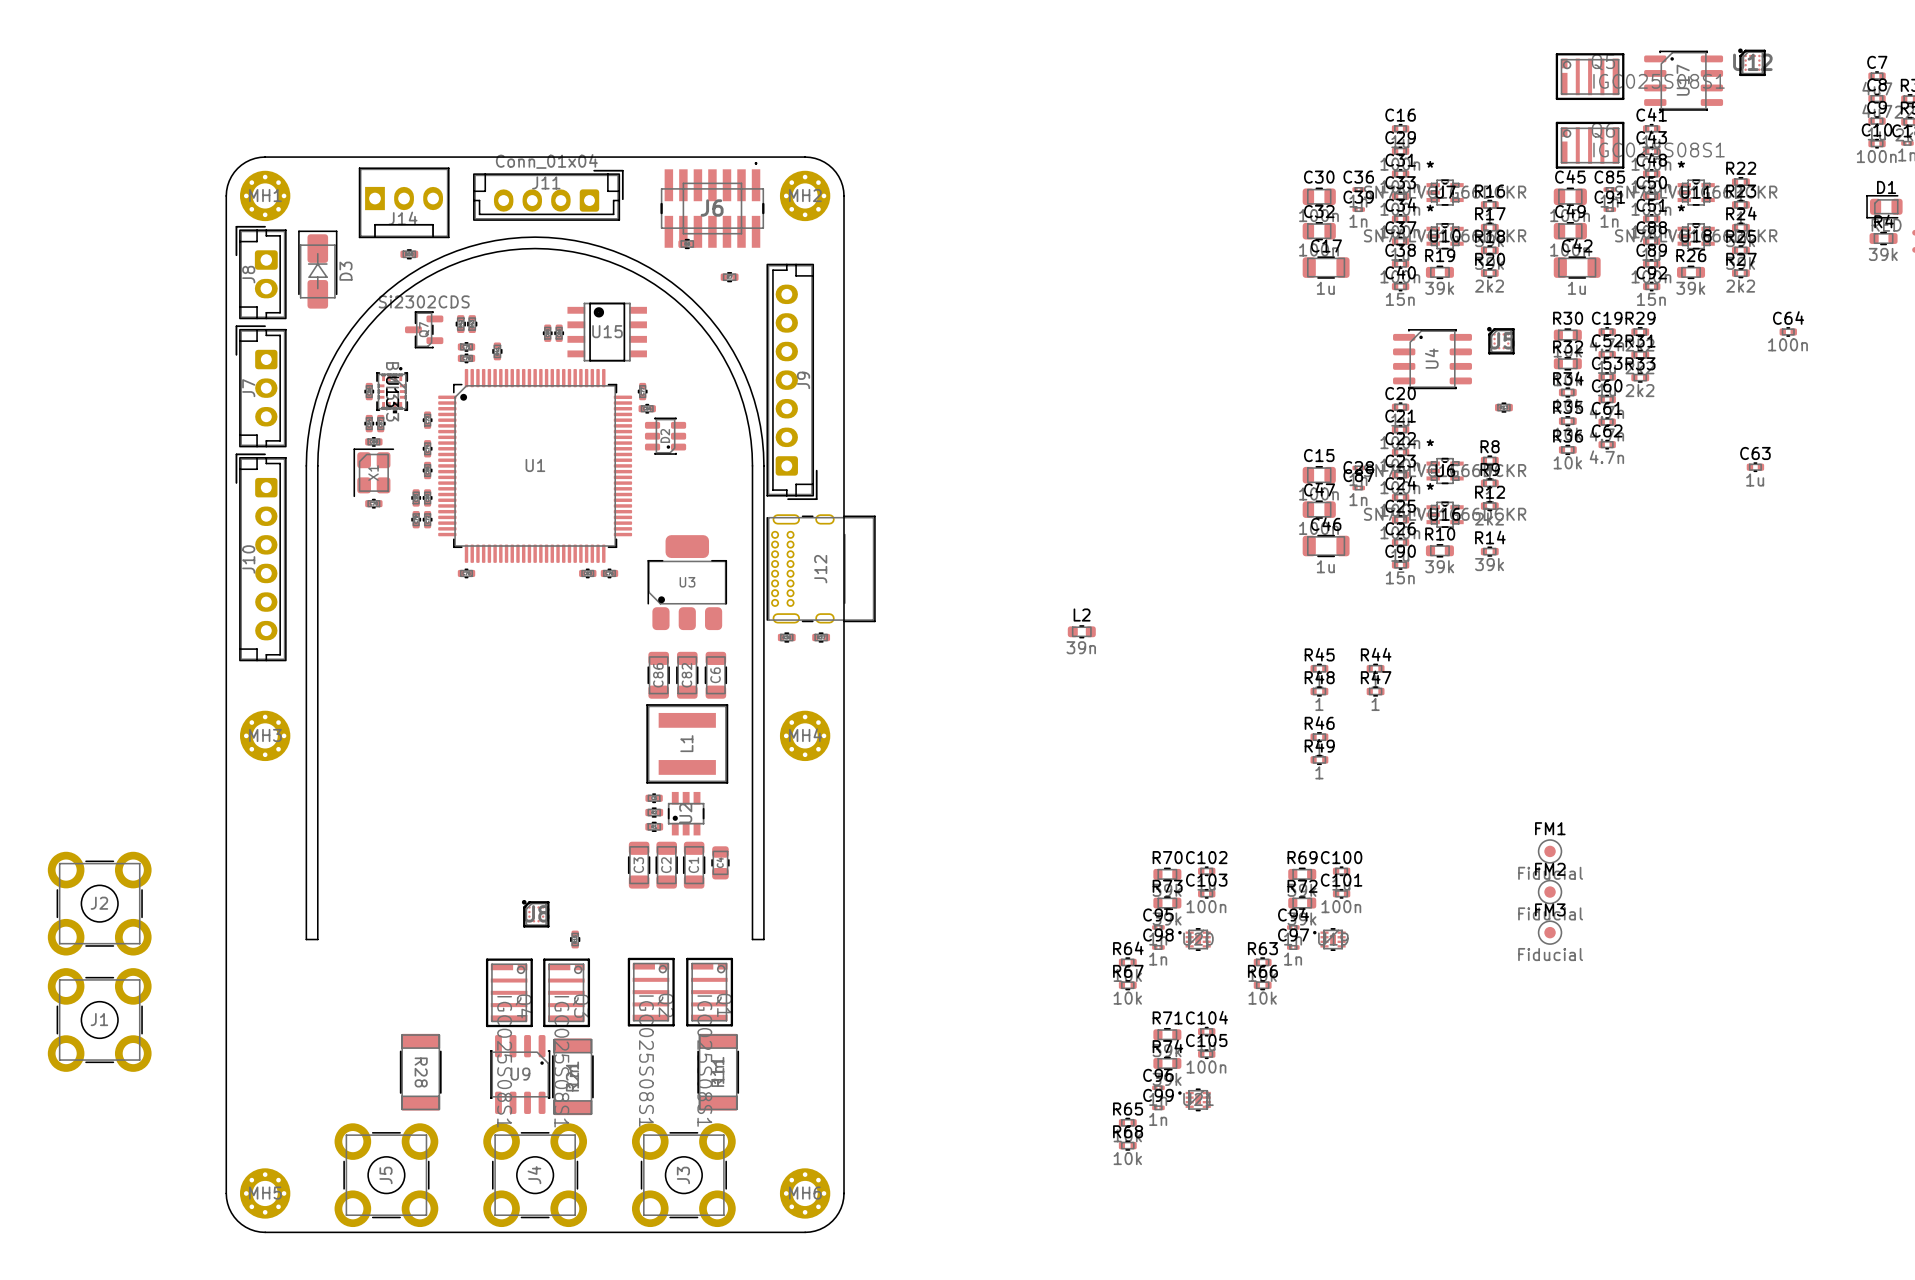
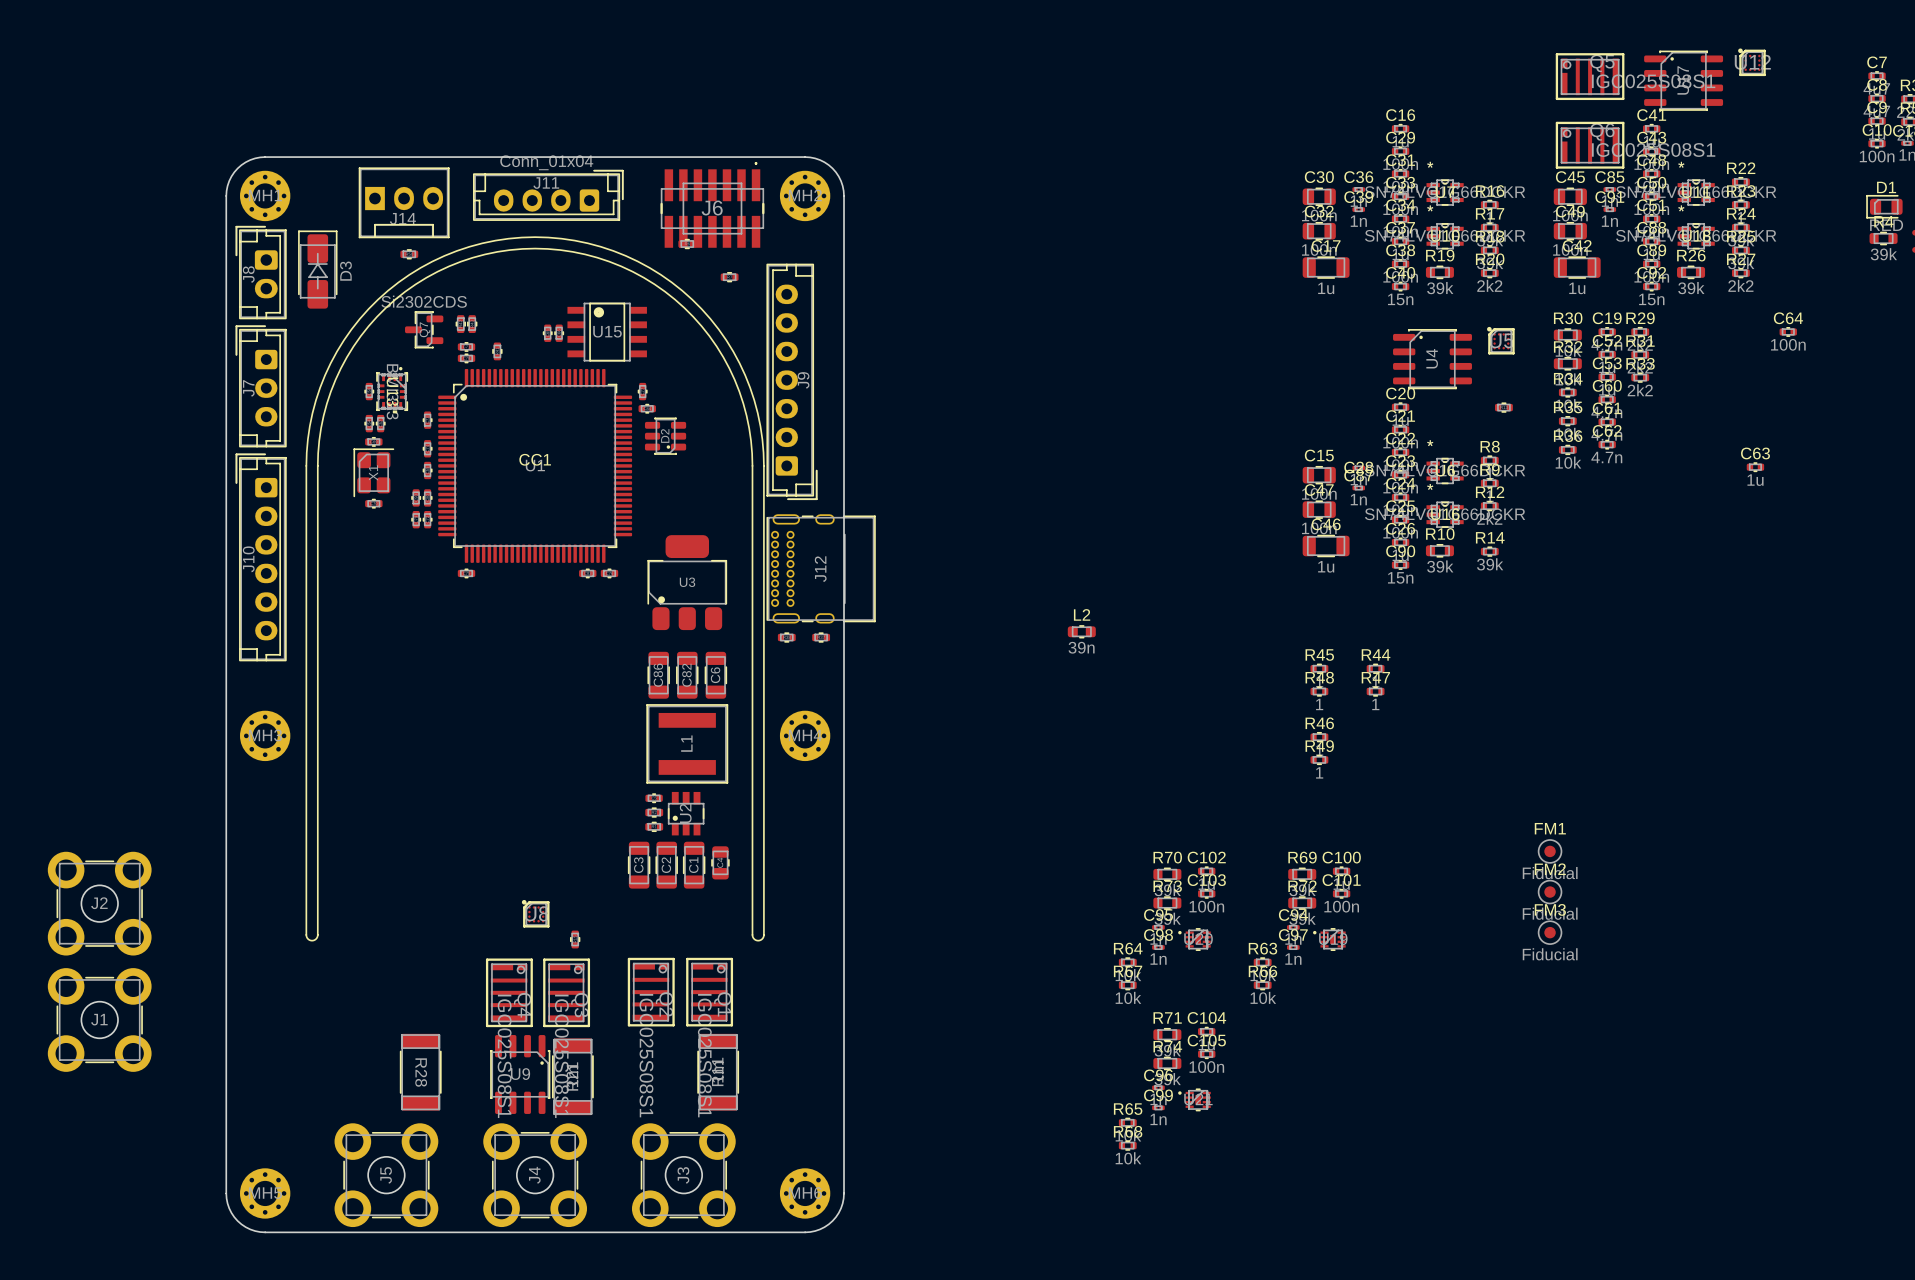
line: (306, 465) (306, 939) (317, 939) (318, 453) (326, 403) (346, 357) (377, 316) (415, 284) (460, 261) (509, 250) (560, 250) (609, 261) (654, 284) (693, 316) (716, 346) (729, 368) (743, 403) (751, 440) (752, 939) (763, 939) (762, 439) (757, 413) (745, 375) (726, 340) (701, 308) (682, 290) (649, 267) (625, 255) (587, 243) (548, 237) (508, 238) (469, 246) (444, 255) (409, 274) (388, 290) (368, 308) (343, 340) (325, 375) (315, 400) (309, 426) (306, 465) -> none
CC1: none -> (535, 588)

